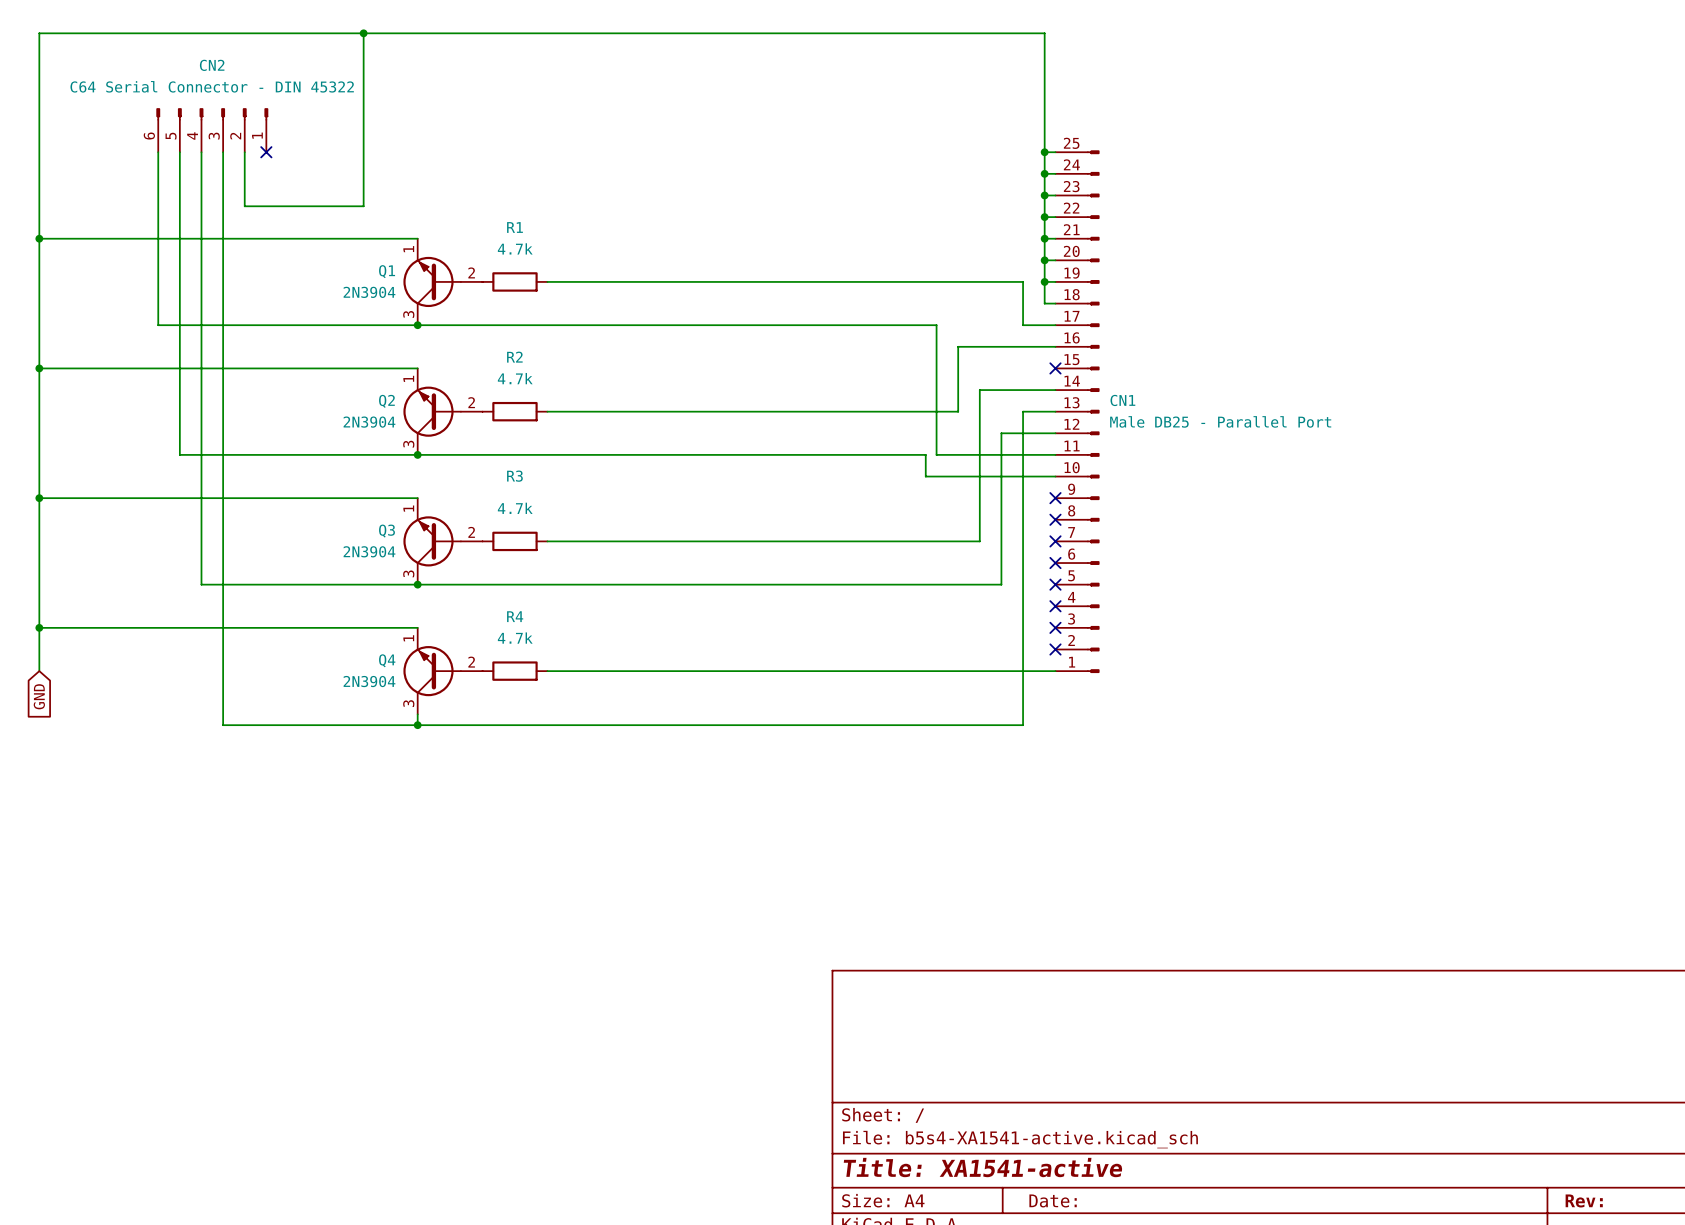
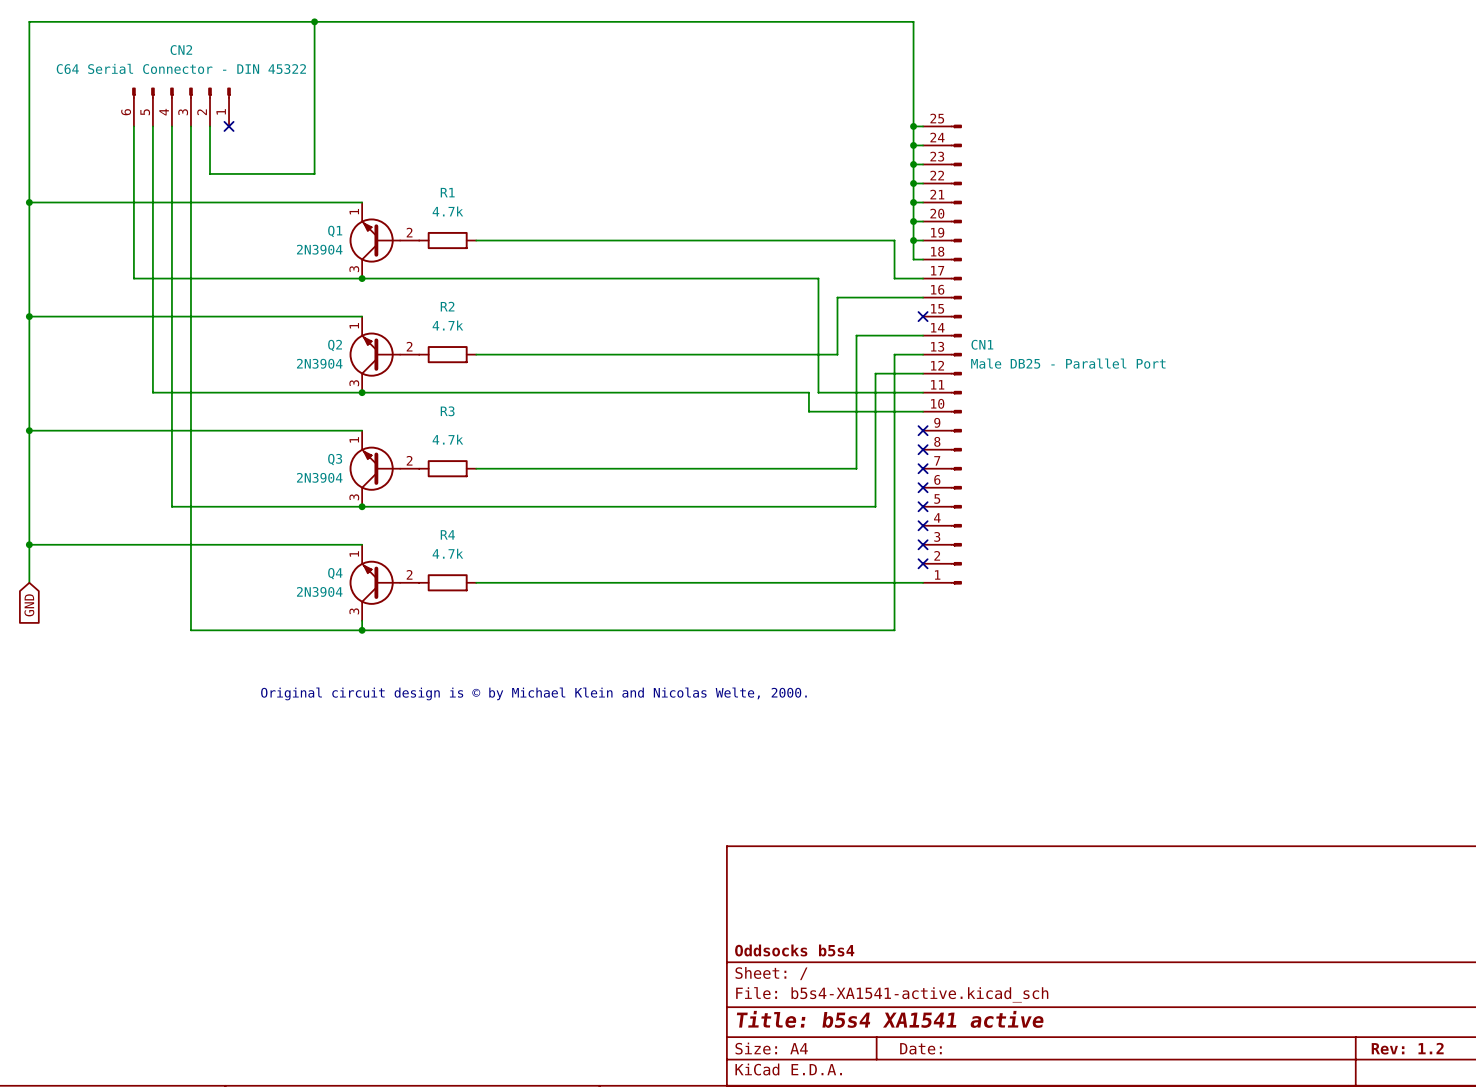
text: none -> Original circuit design is © by Michael Klein and Nicolas Welte, 2000. (533, 693)
title block: none -> Oddsocks b5s4 (794, 950)
title block: Title: XA1541-active (983, 1167) -> Title: b5s4 XA1541 active (890, 1019)
title block: Rev: (1584, 1200) -> Rev: 1.2 (1407, 1048)

